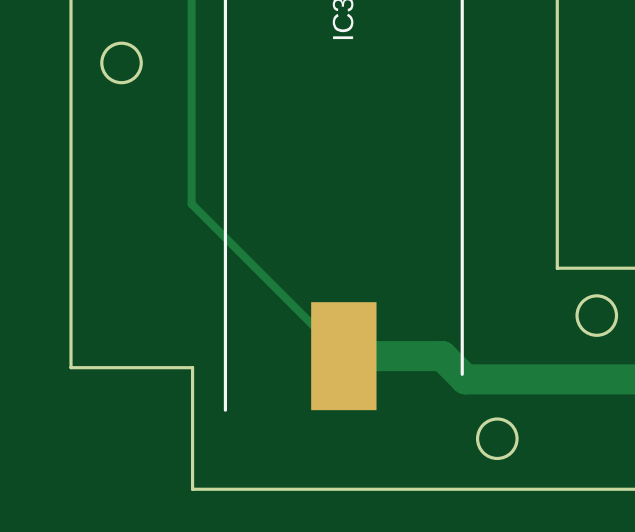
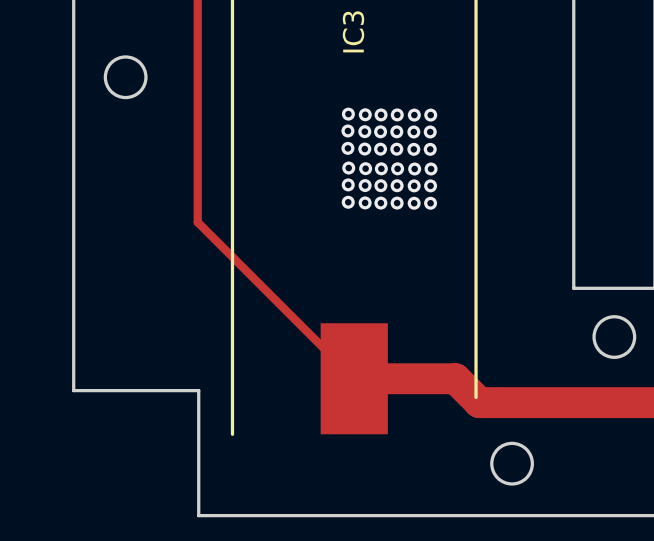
via: none -> (348, 114)
via: none -> (365, 114)
via: none -> (381, 114)
via: none -> (397, 114)
via: none -> (414, 115)
via: none -> (430, 115)
via: none -> (347, 131)
via: none -> (364, 131)
via: none -> (380, 131)
via: none -> (396, 131)
via: none -> (413, 131)
via: none -> (430, 131)
via: none -> (347, 148)
via: none -> (364, 149)
via: none -> (380, 149)
via: none -> (396, 149)
via: none -> (413, 149)
via: none -> (430, 149)
via: none -> (348, 168)
via: none -> (365, 168)
via: none -> (381, 168)
via: none -> (397, 168)
via: none -> (414, 168)
via: none -> (431, 168)
via: none -> (348, 184)
via: none -> (365, 185)
via: none -> (380, 185)
via: none -> (397, 185)
via: none -> (414, 185)
via: none -> (430, 185)
via: none -> (348, 202)
via: none -> (365, 202)
via: none -> (380, 203)
via: none -> (397, 203)
via: none -> (414, 203)
via: none -> (430, 203)

